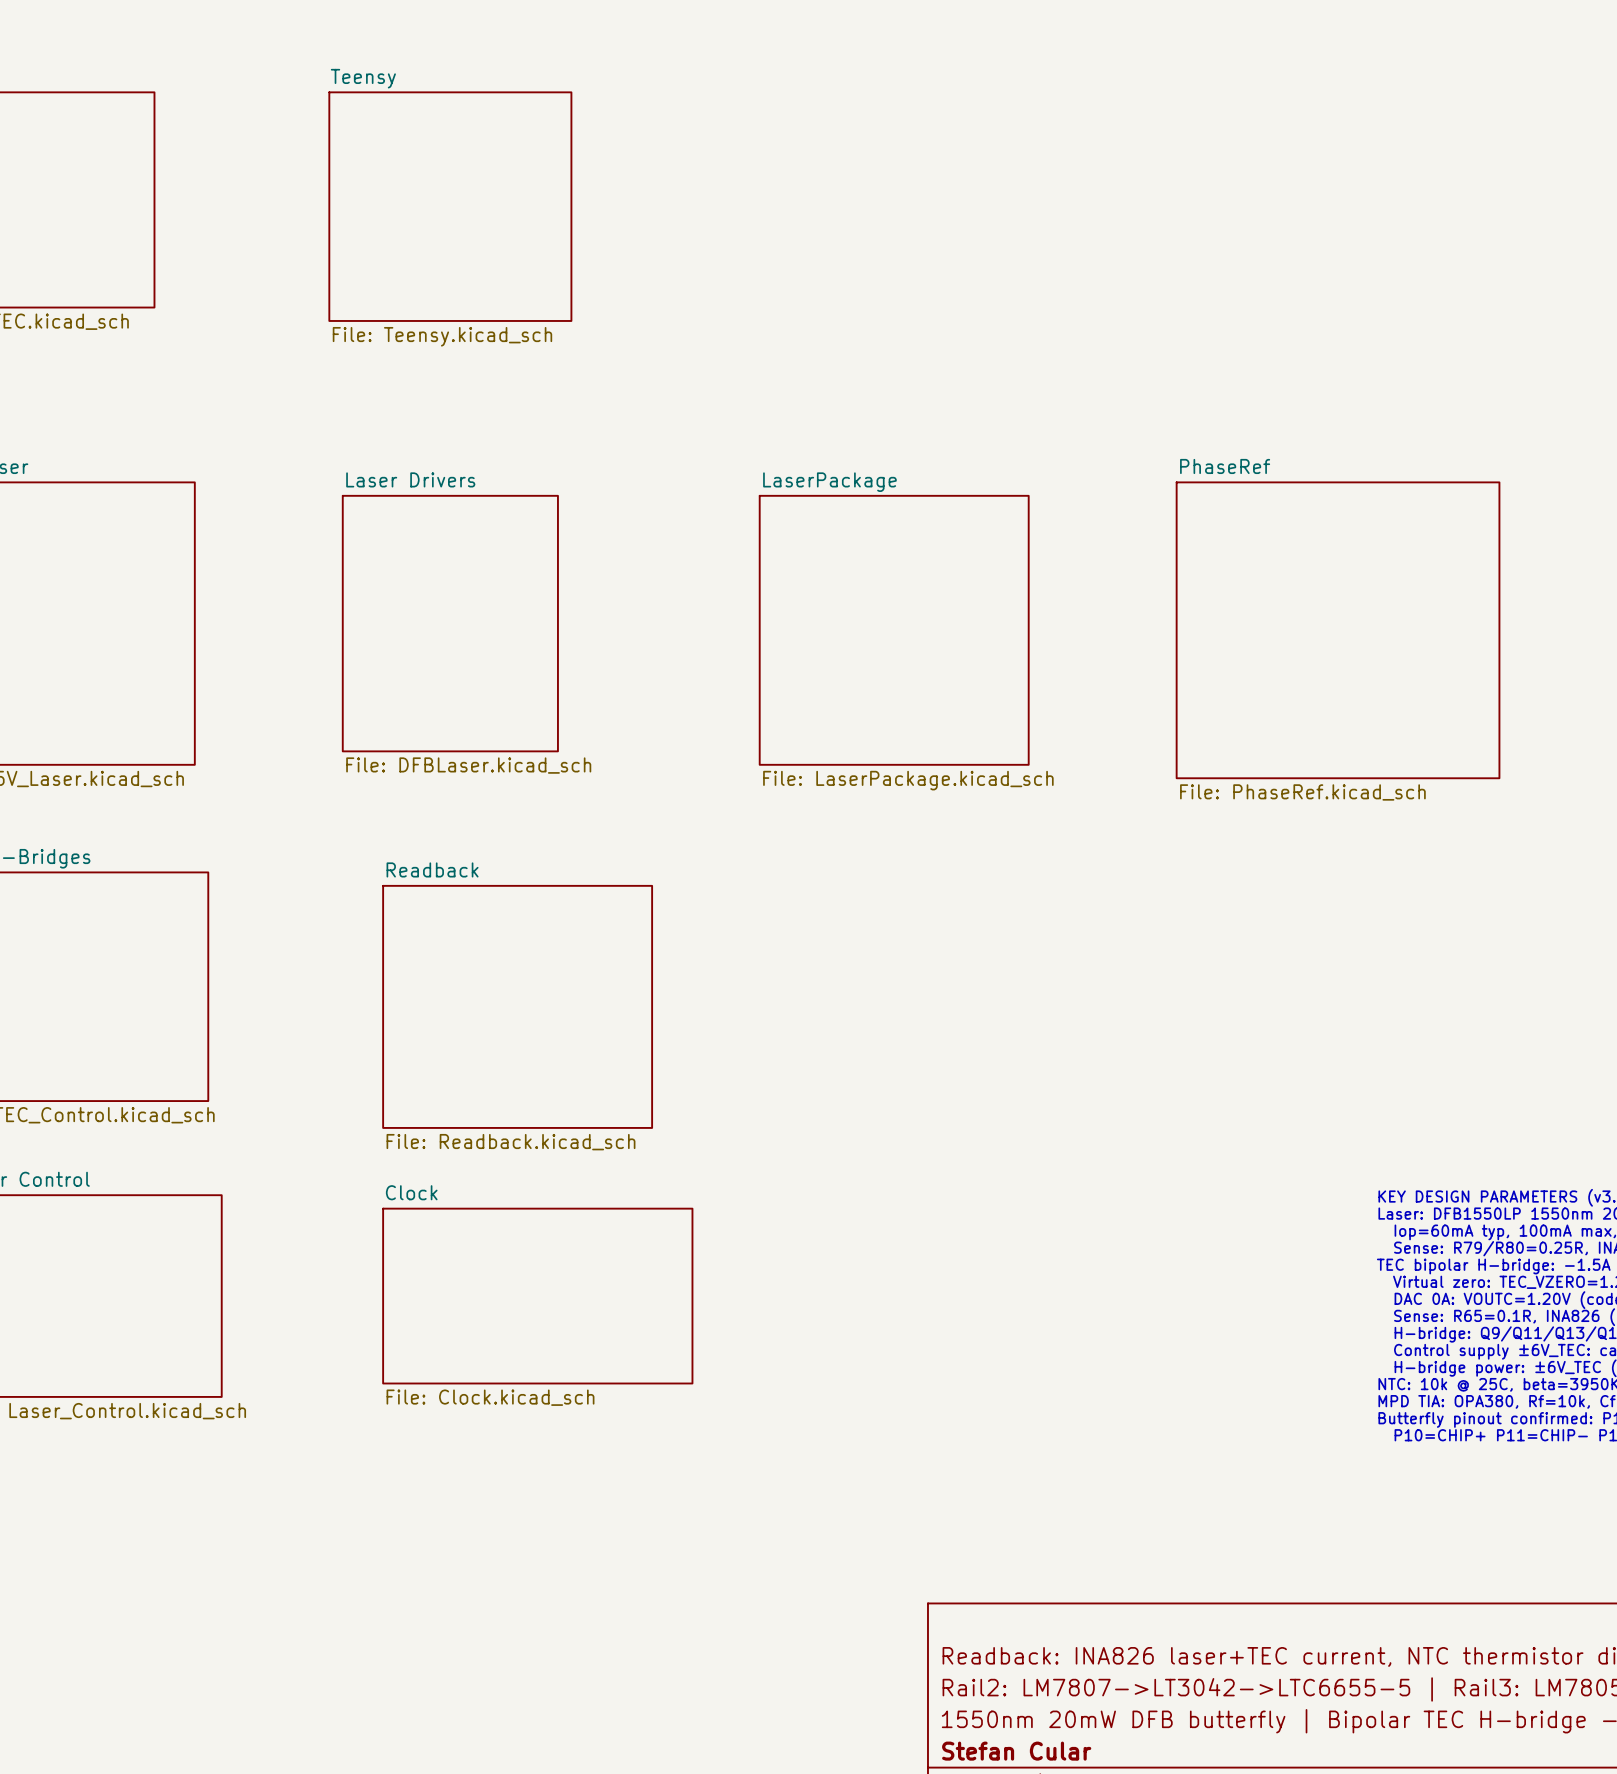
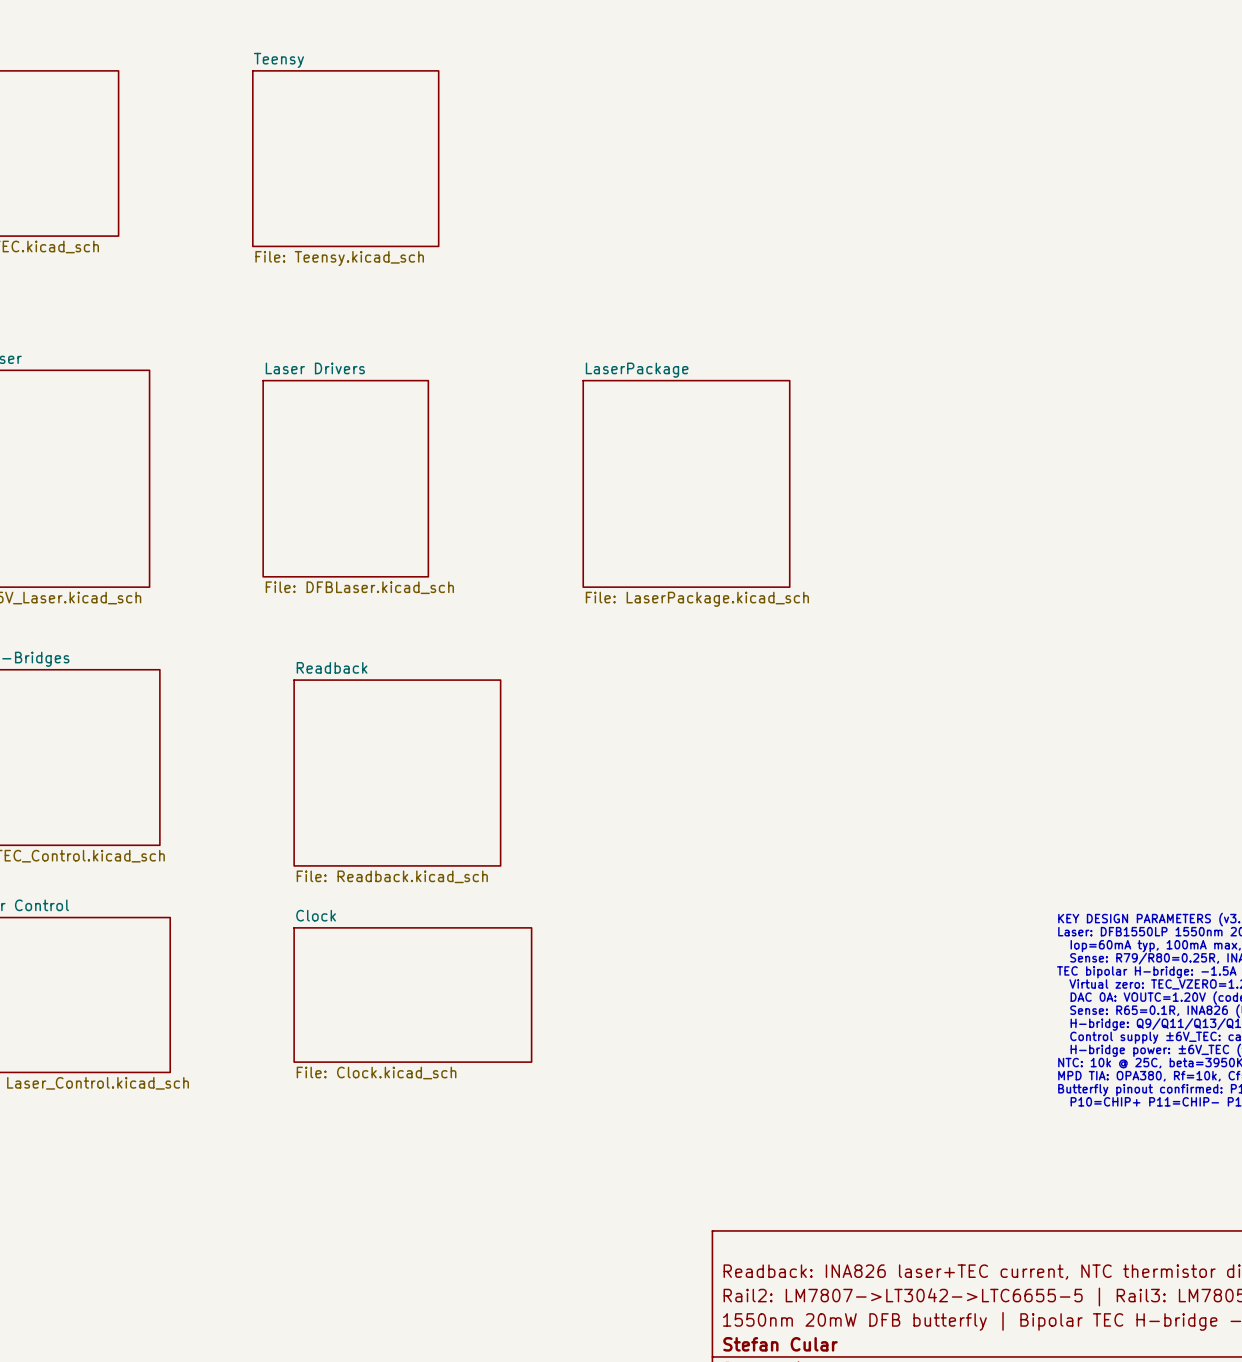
sheet PhaseRef: File: PhaseRef.kicad_sch (1338, 630) -> none

